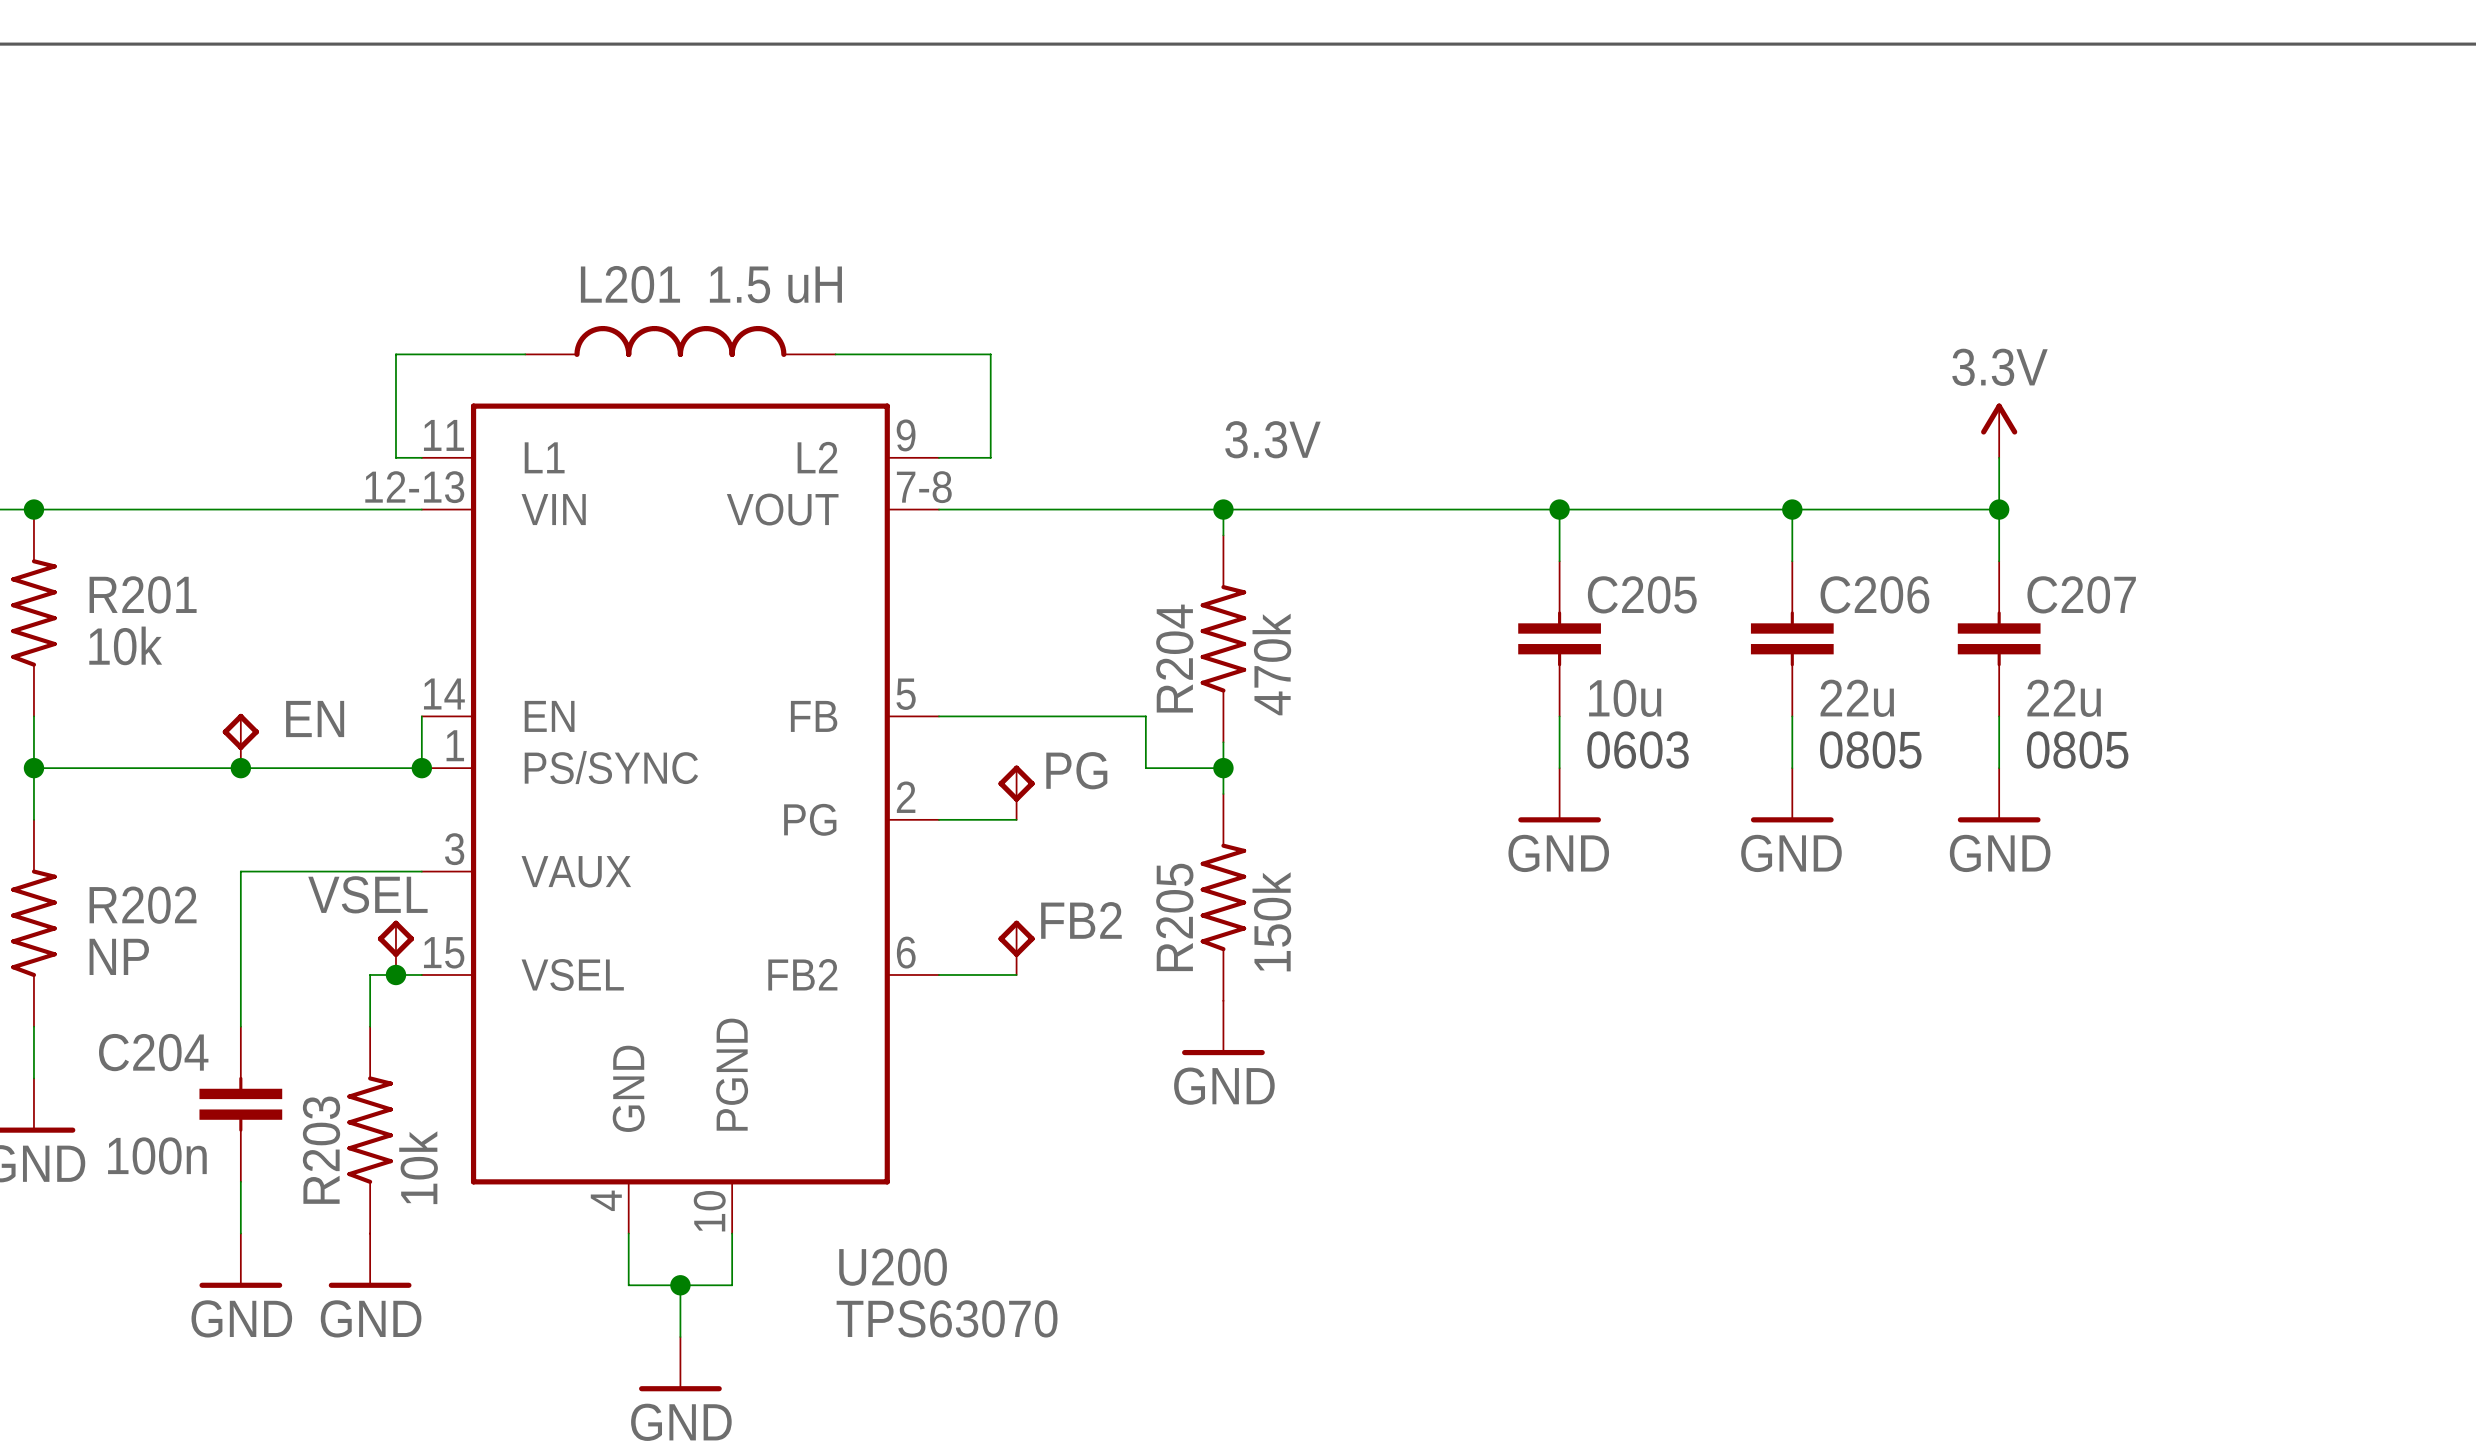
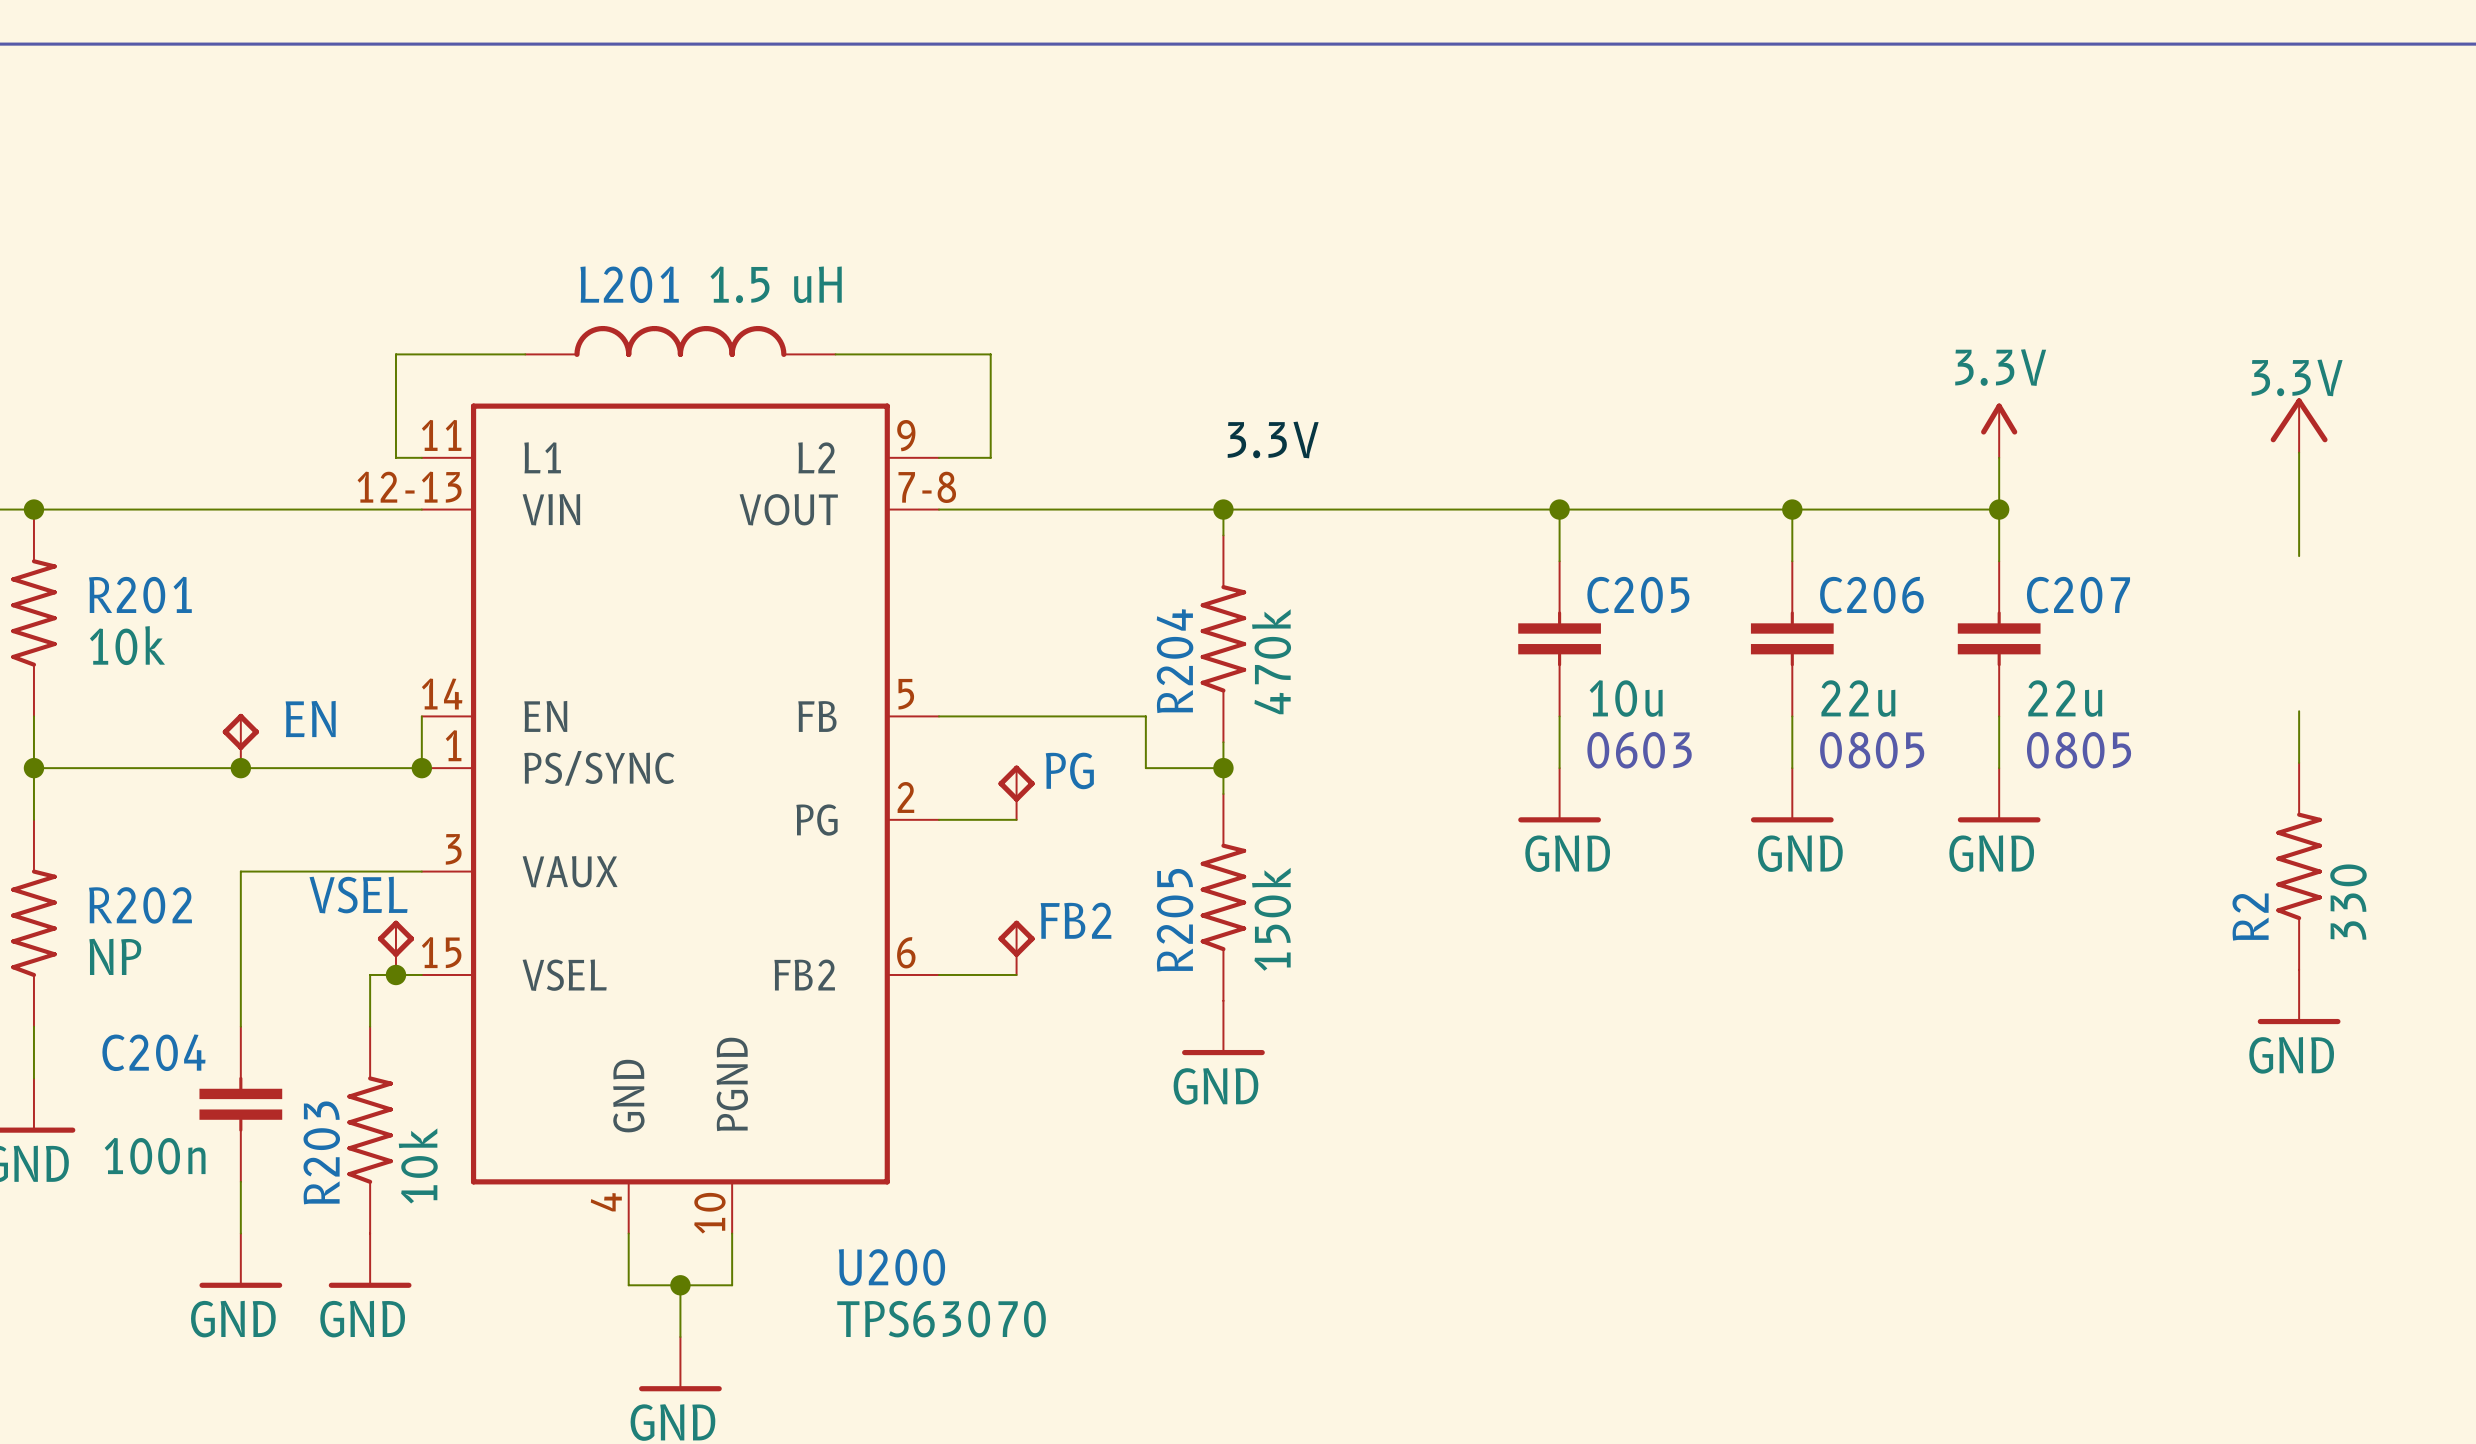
power symbol: none -> 3.3V (2299, 425)
wire: none -> (2299, 452) (2299, 556)
wire: none -> (2299, 711) (2299, 762)
R2: none -> 330 (2299, 866)
power symbol: none -> GND (2299, 996)

